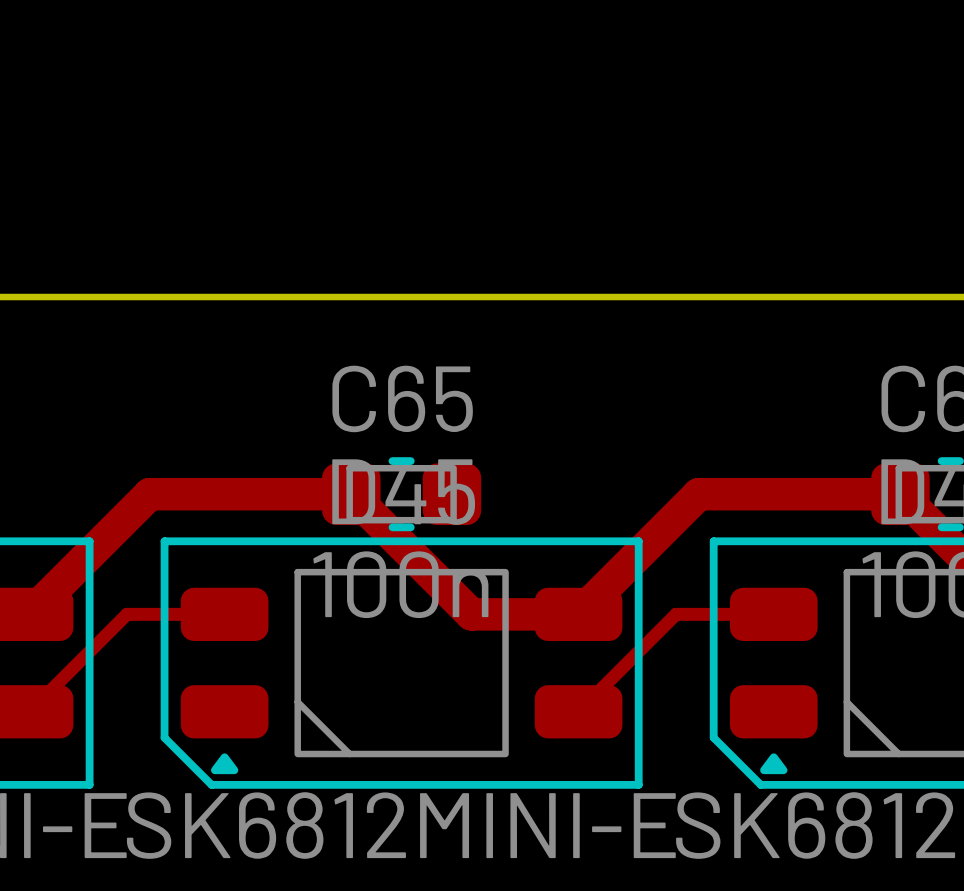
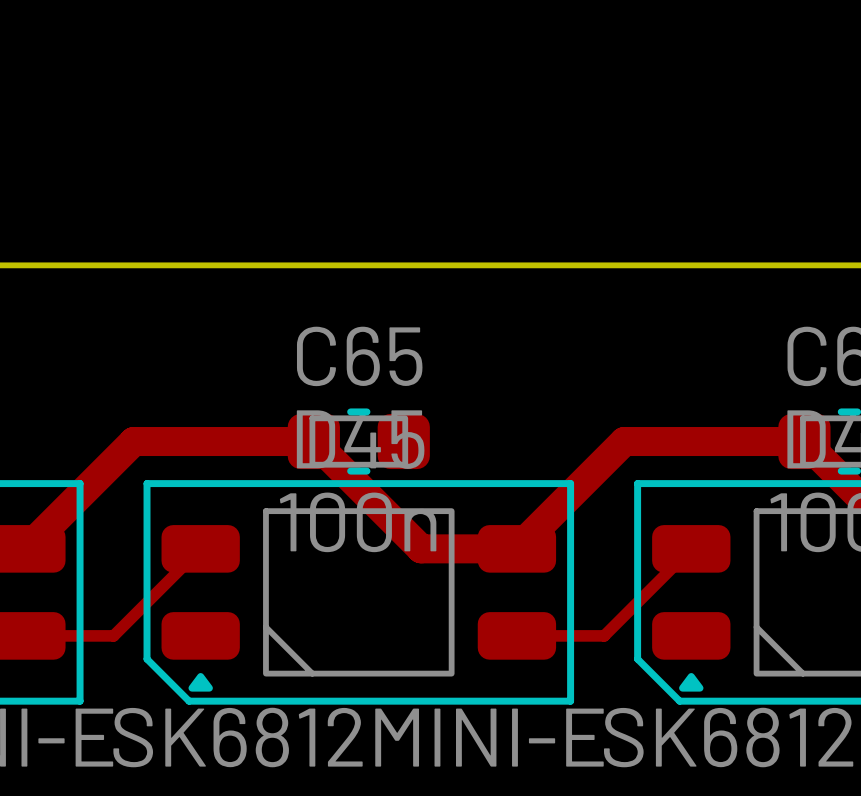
top track: (224, 614) (126, 614) (29, 711) -> (200, 548) (113, 635) (26, 635)
top track: (773, 614) (676, 614) (578, 711) -> (691, 548) (604, 635) (516, 635)

